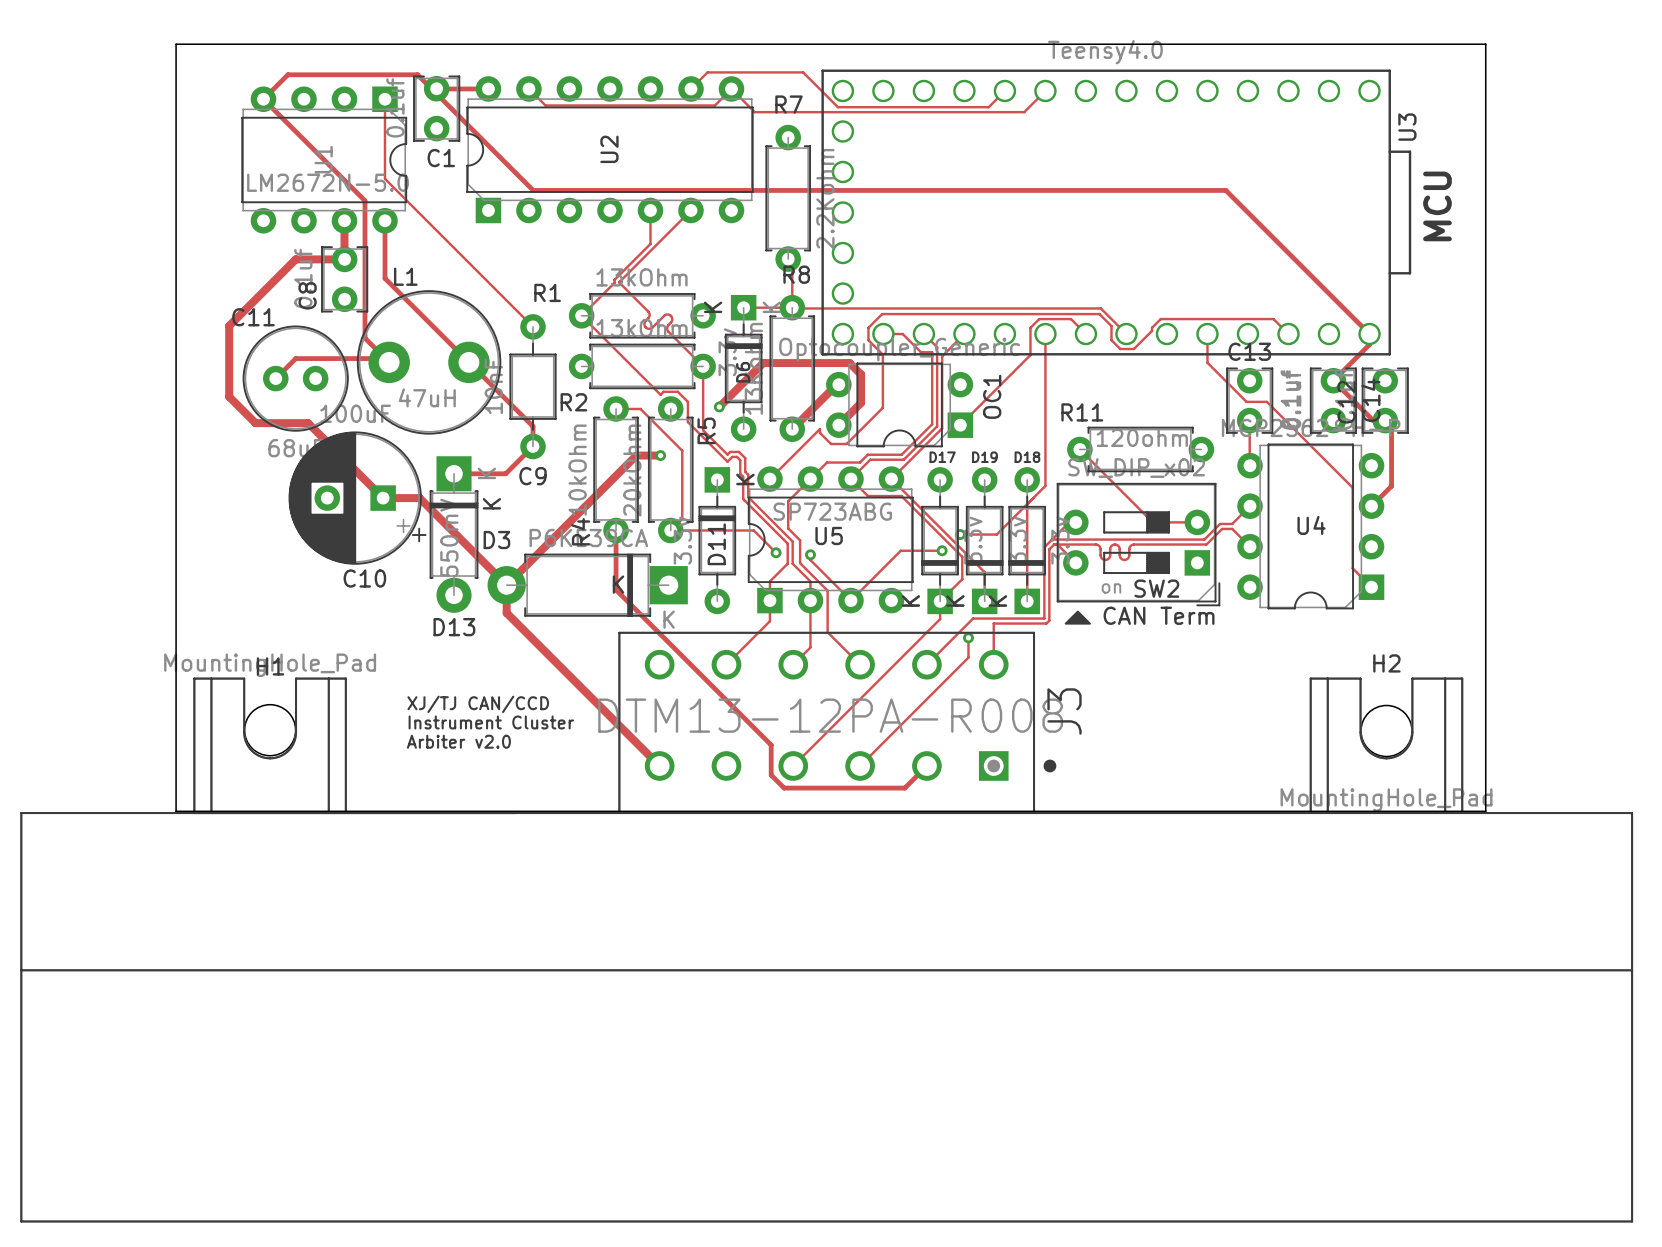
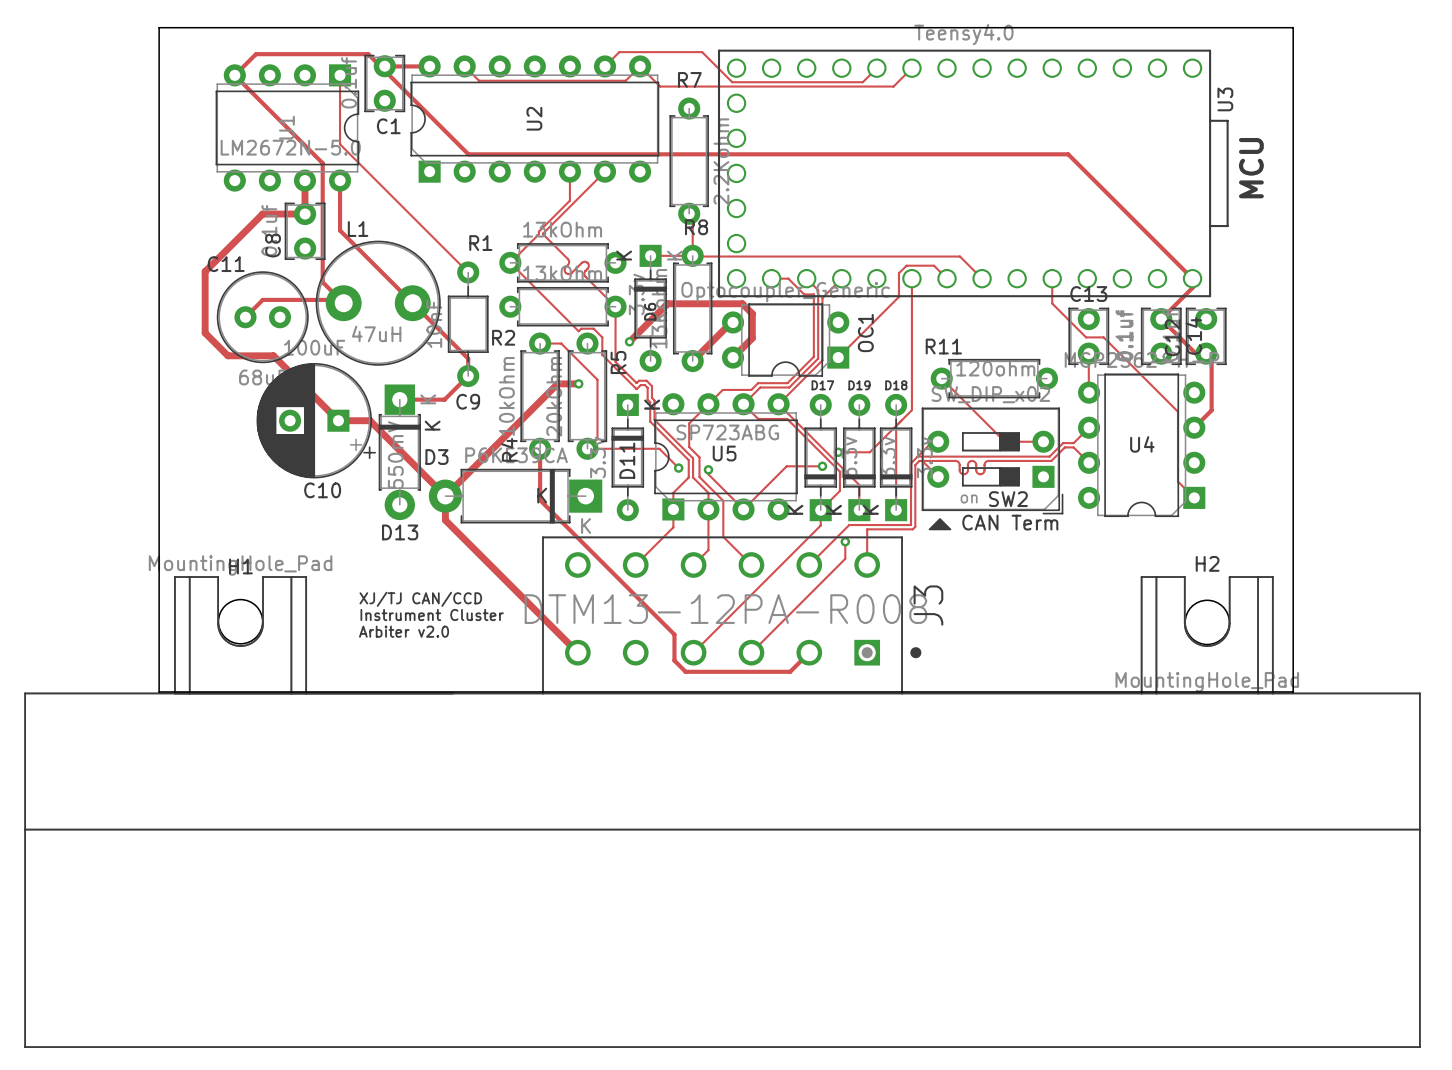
track: (1288, 334) (1273, 319) (1160, 319) (1133, 348) (1120, 348) (1111, 340) (1111, 326) (1099, 314) (882, 314) (868, 327) (868, 340) (882, 354) (882, 407) (846, 444) (831, 444) (820, 432) (820, 429) (769, 479) -> none

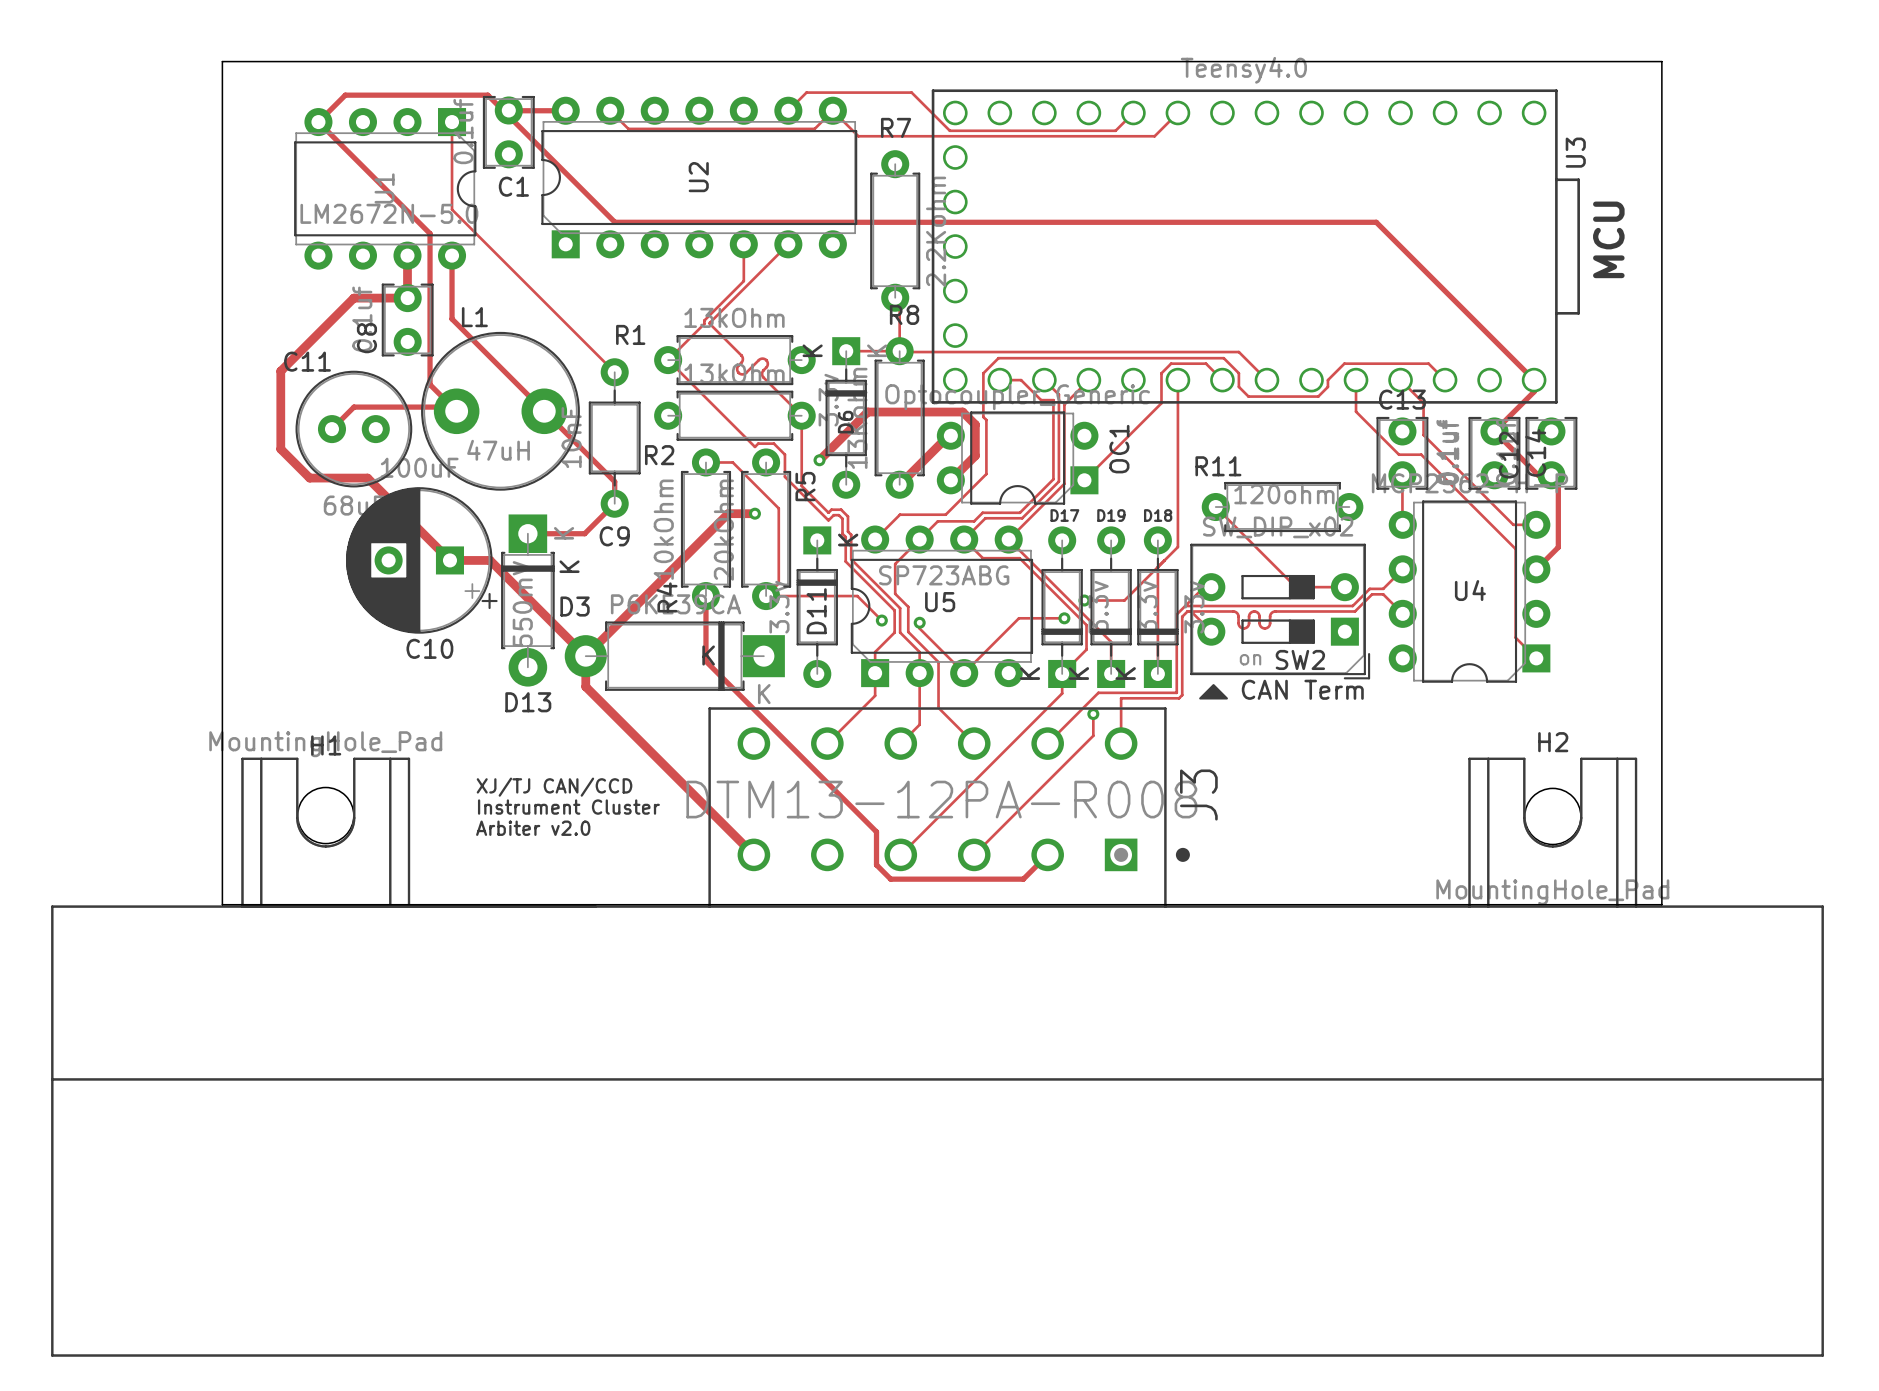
track: none -> (1400, 380) (1423, 403) (1423, 435) (1513, 524) (1536, 524)
track: none -> (1445, 380) (1428, 363) (1344, 363) (1327, 380) (1327, 386) (1318, 396) (1248, 396) (1238, 386) (1238, 373) (1223, 358) (998, 358) (983, 373) (983, 417) (986, 420) (986, 474) (945, 514) (899, 514) (875, 539)

